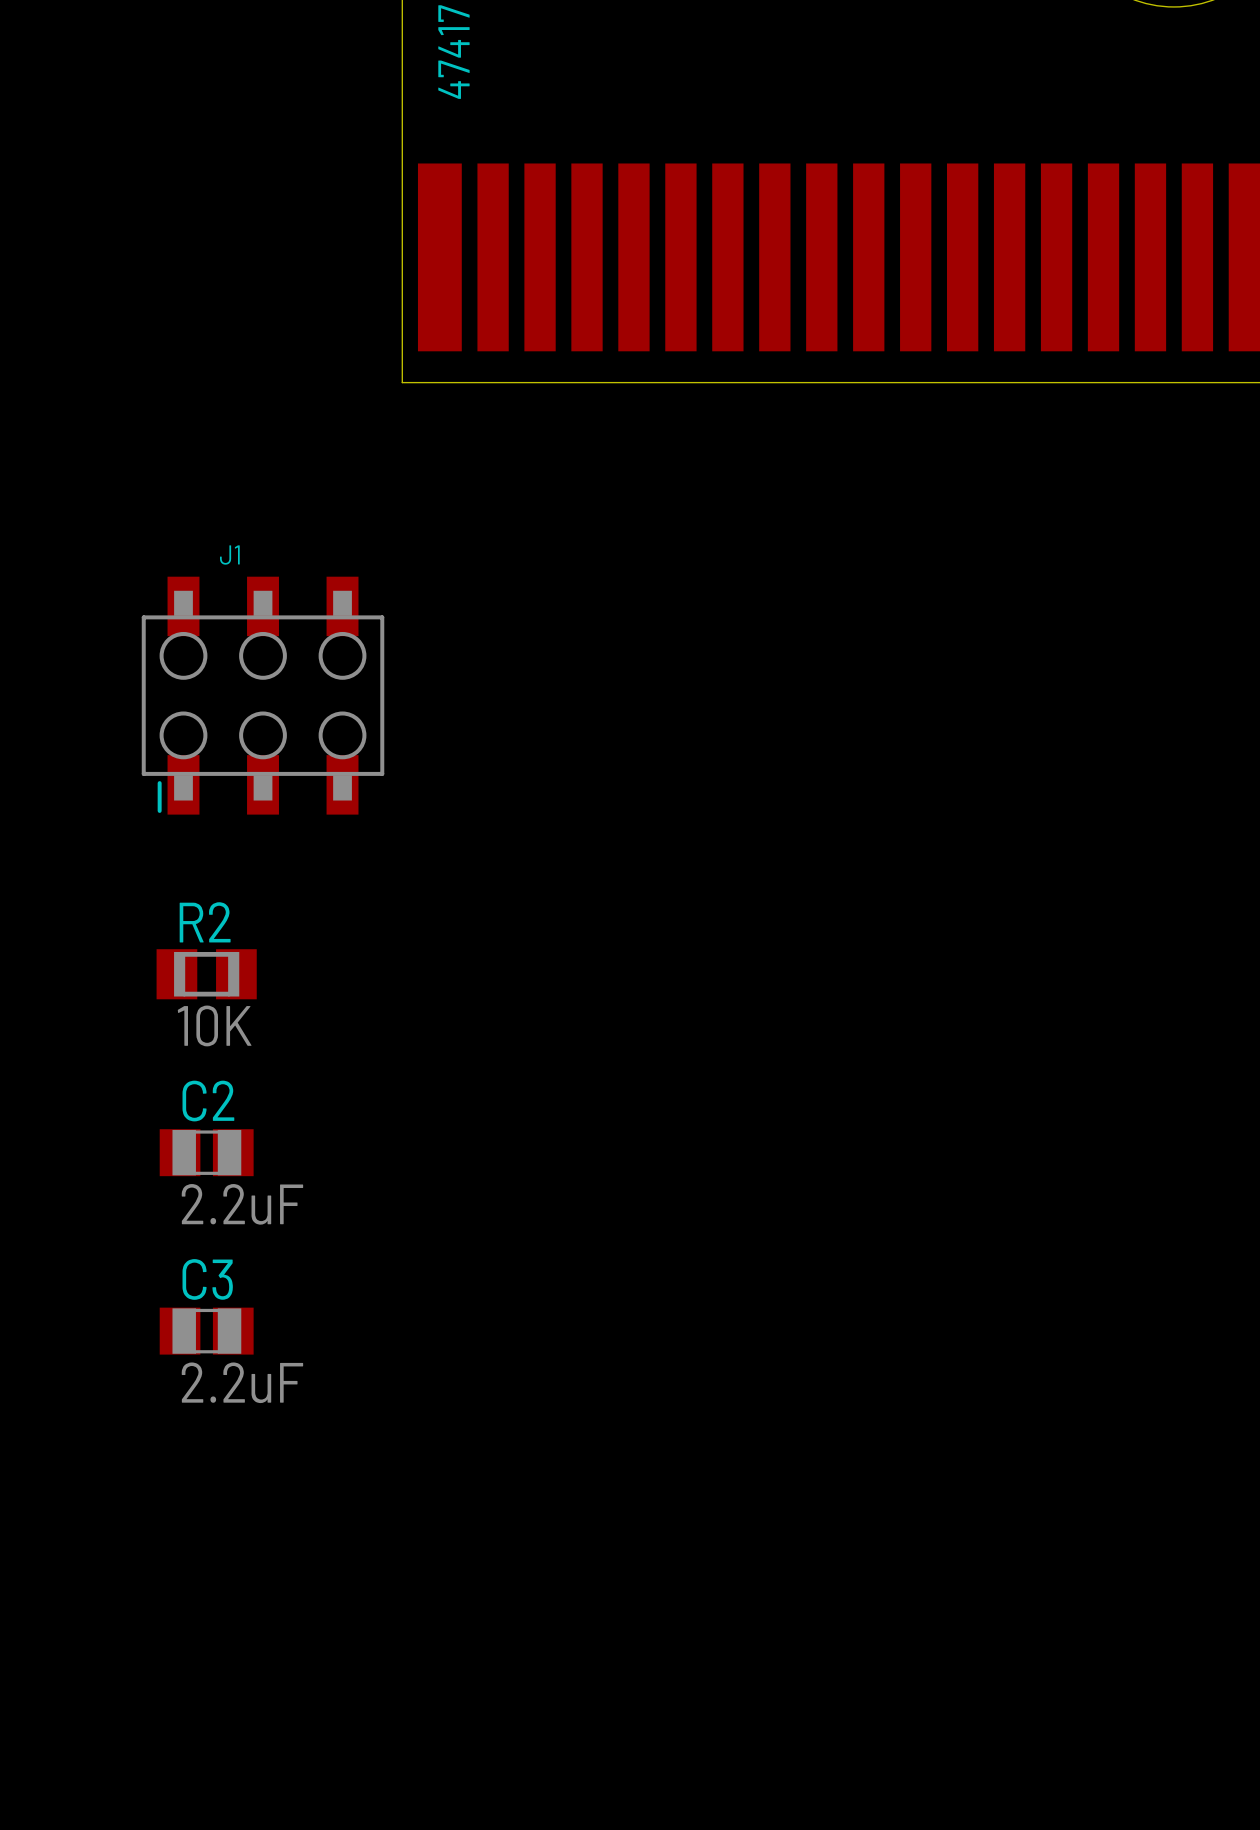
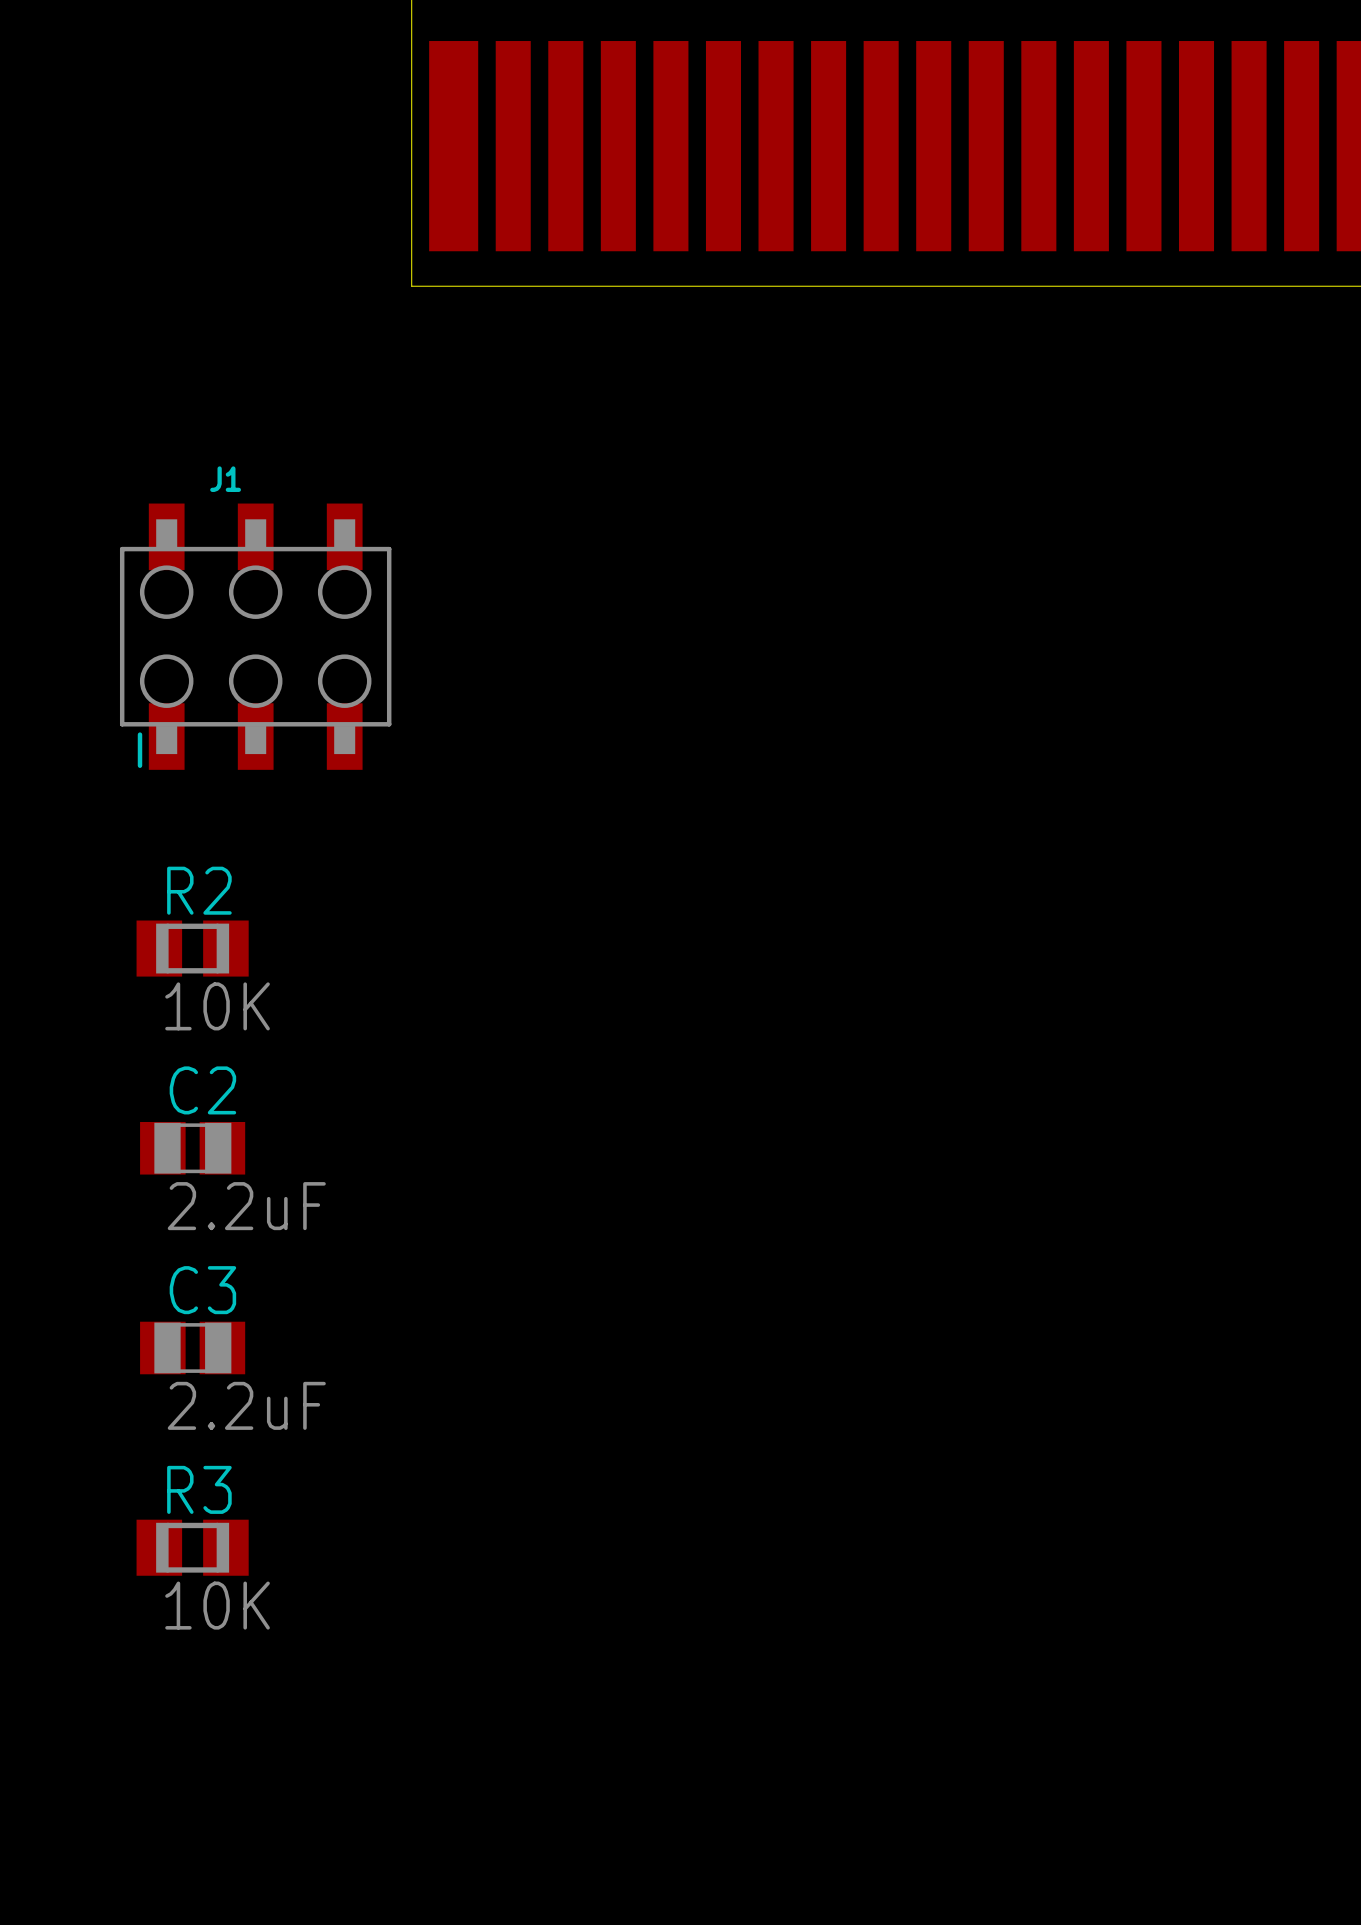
R3: none -> 10K (192, 1547)

